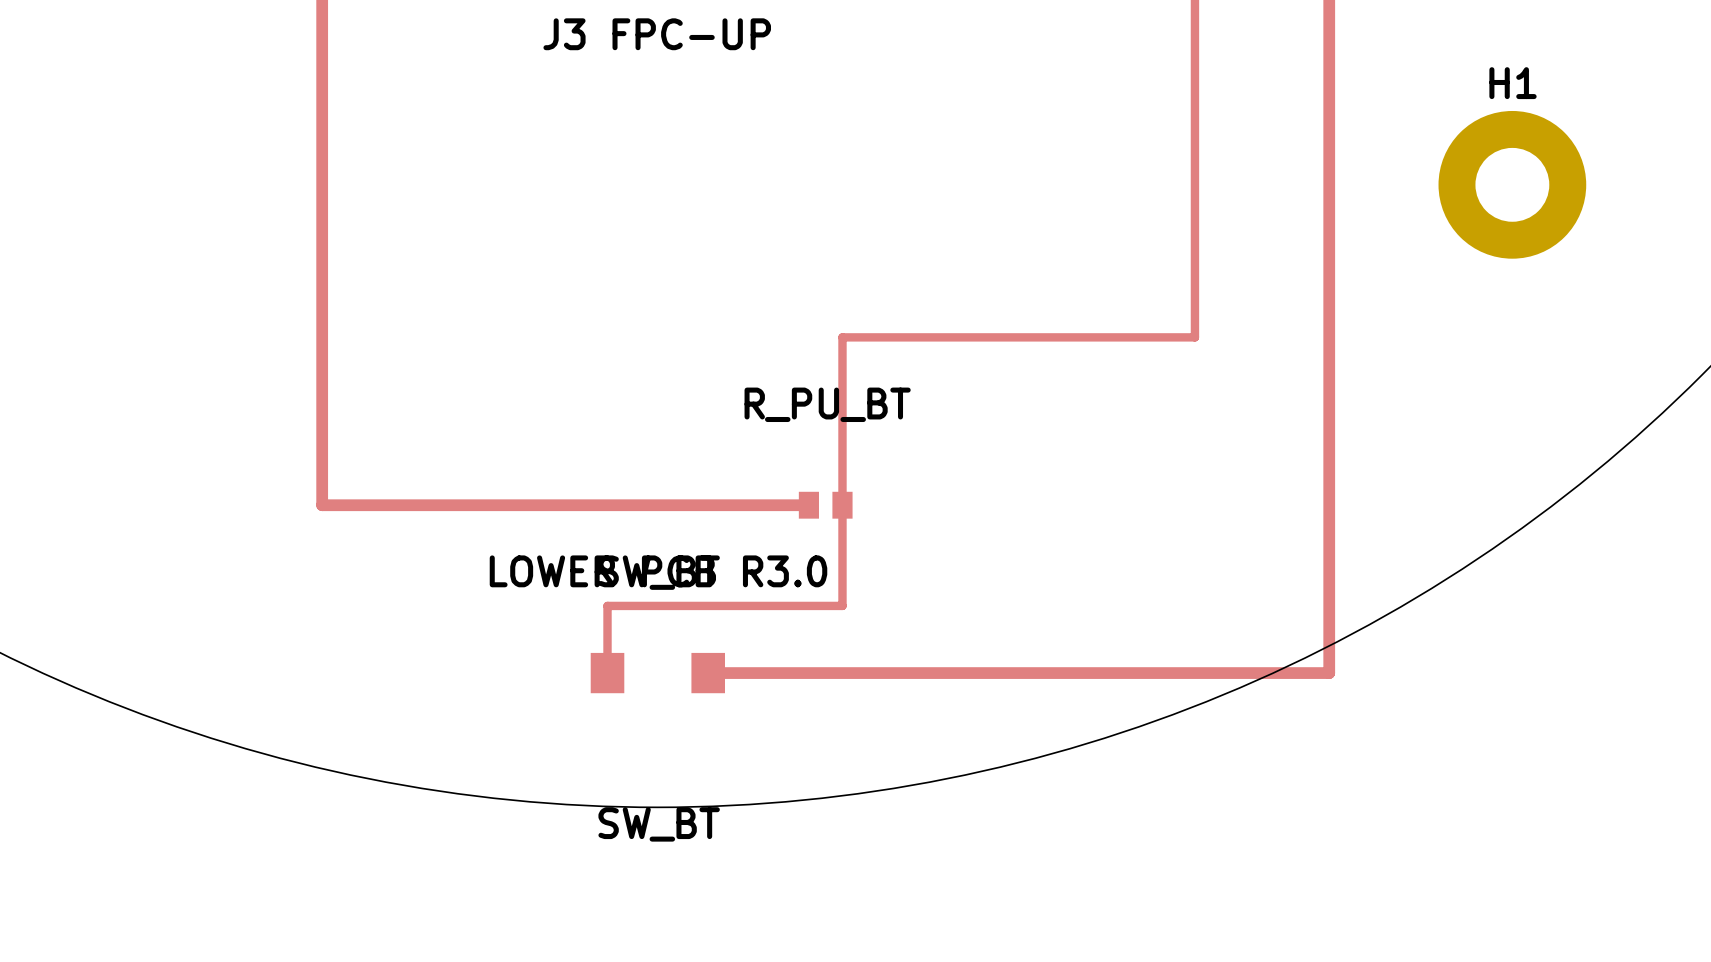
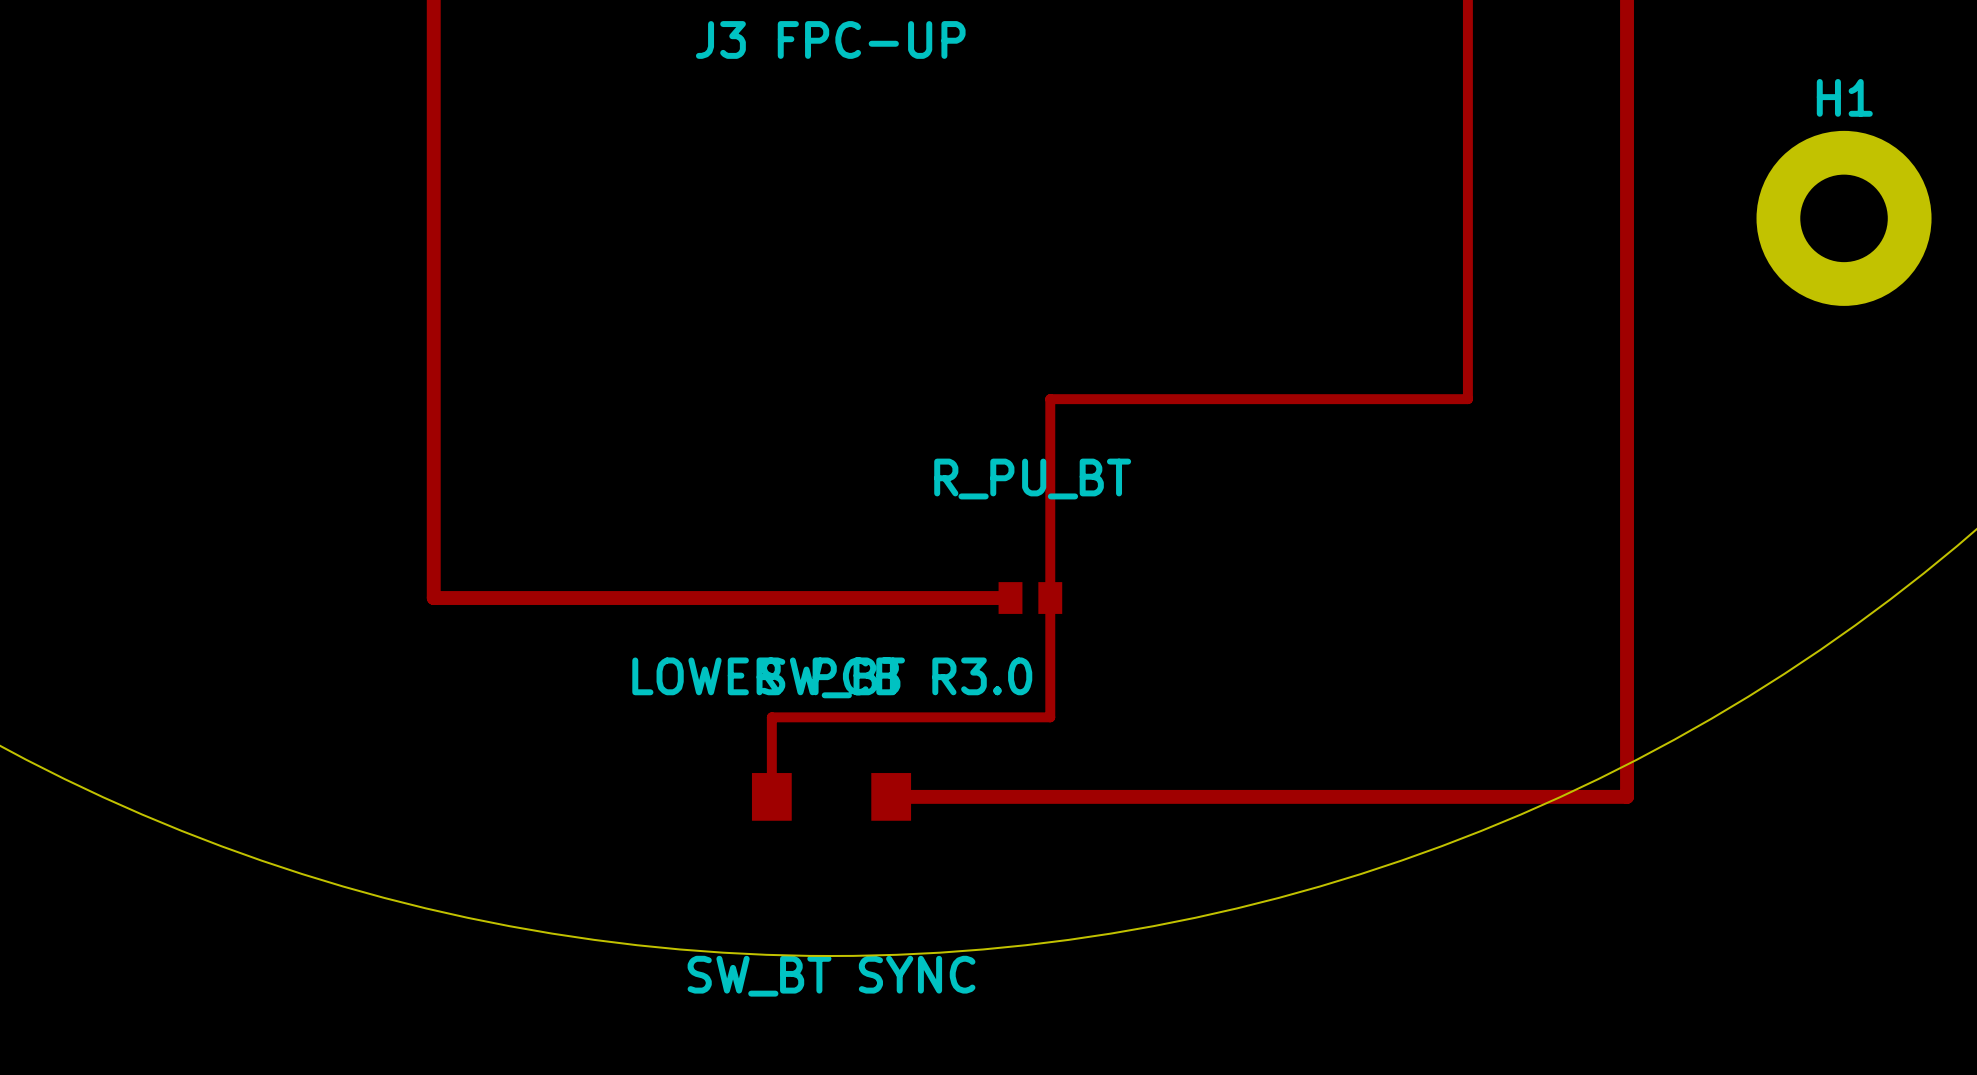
text: SW_BT (659, 824) -> SW_BT SYNC (831, 976)

